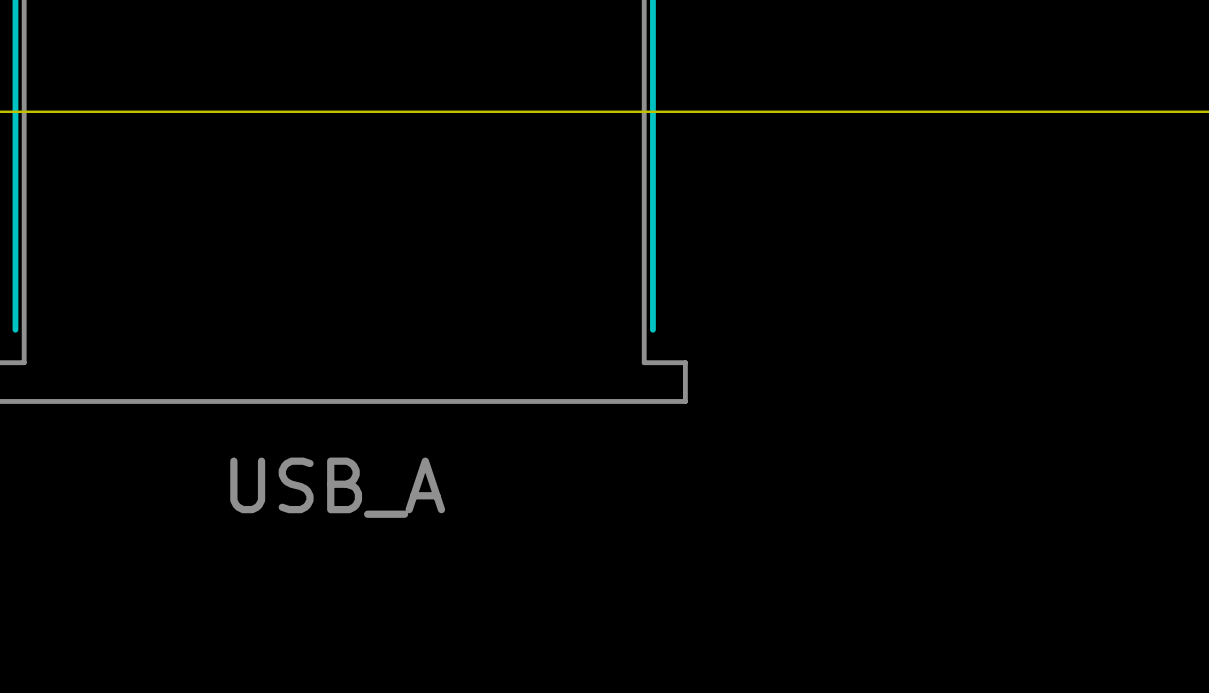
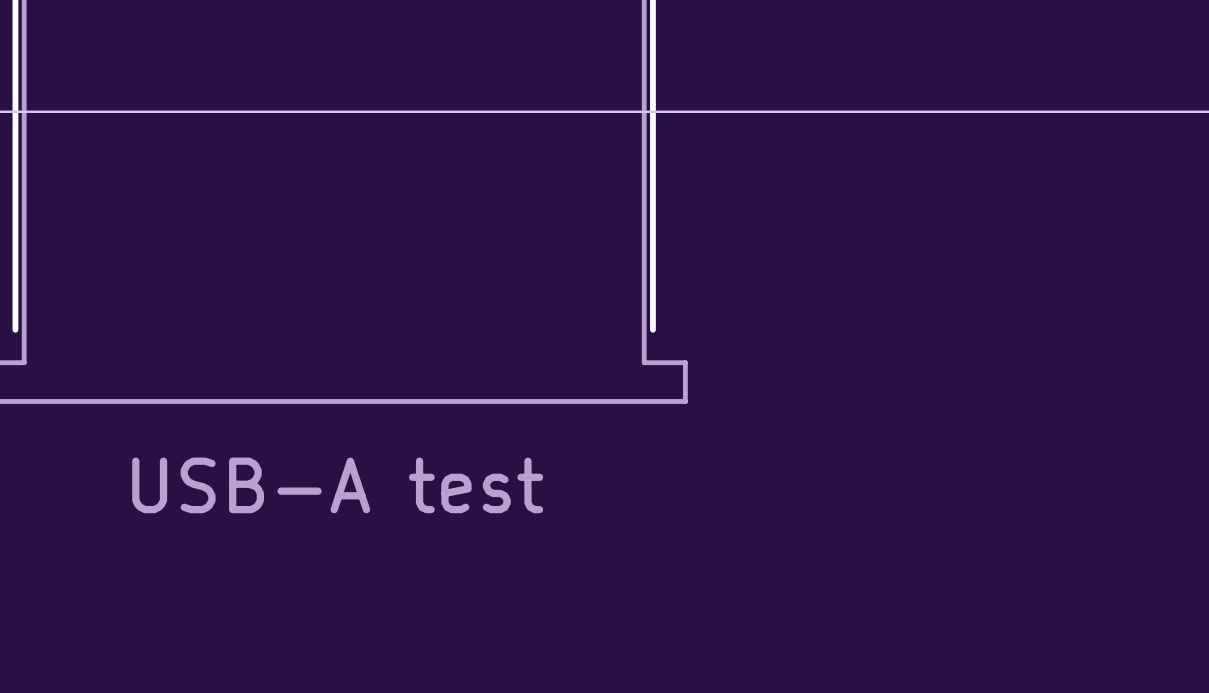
part value: USB_A (337, 487) -> USB-A test (337, 485)

